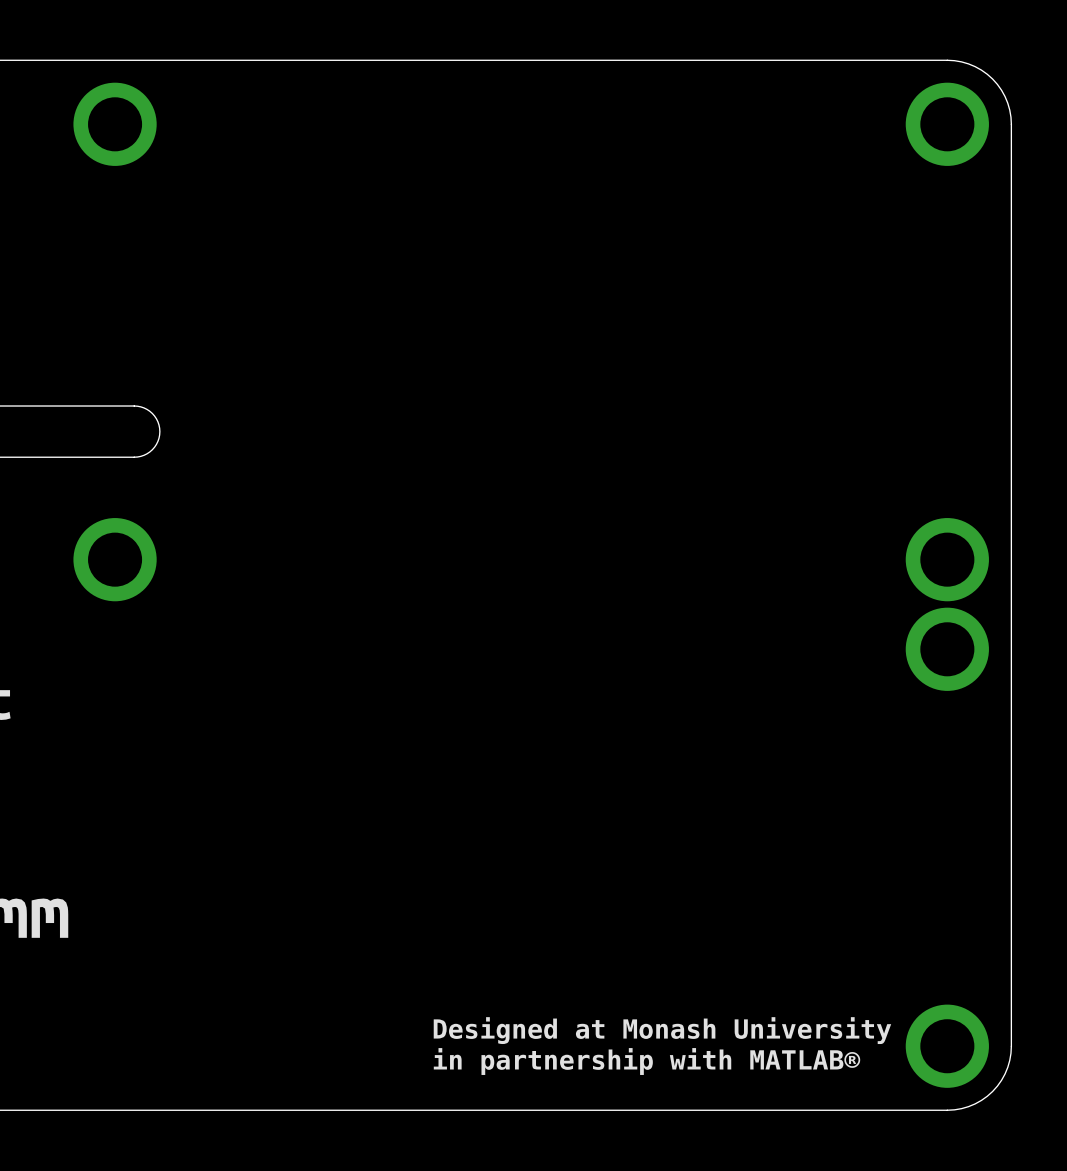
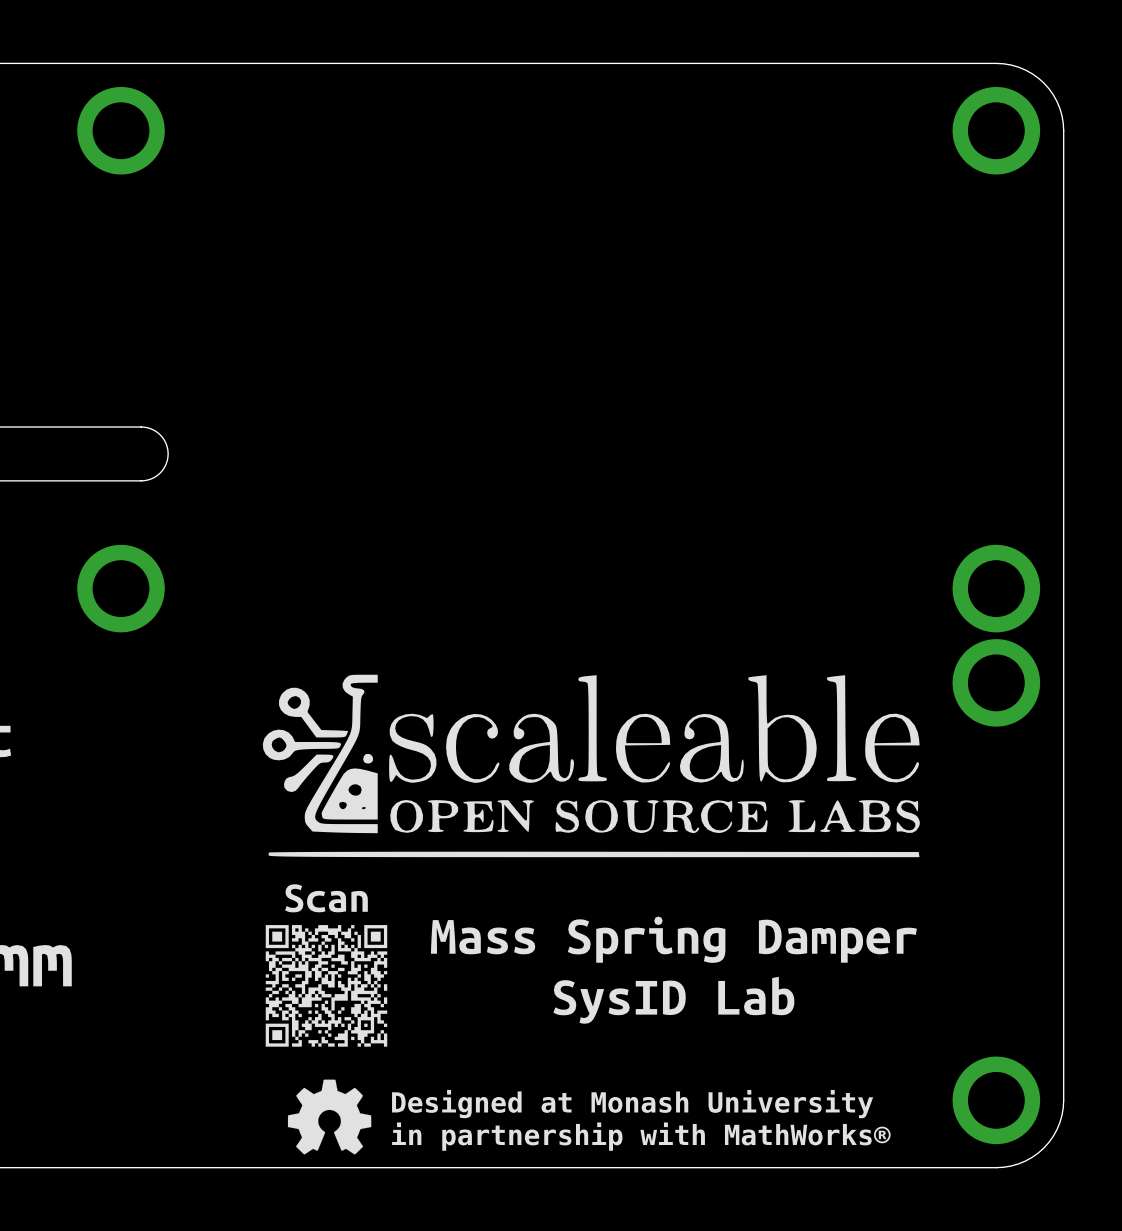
drawing: none -> [262, 674, 920, 858]
drawing: none -> [265, 884, 388, 1047]
drawing: none -> [430, 916, 917, 1024]
drawing: none -> [287, 1079, 372, 1155]
text position: Designed at Monash University (662, 1030) -> Designed at Monash University (632, 1104)
text: in partnership with MATLAB® (647, 1061) -> in partnership with MathWorks® (641, 1136)

